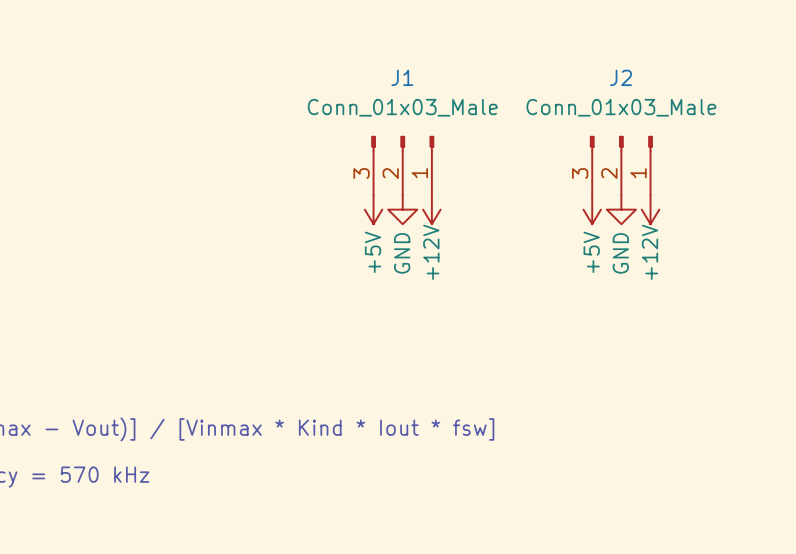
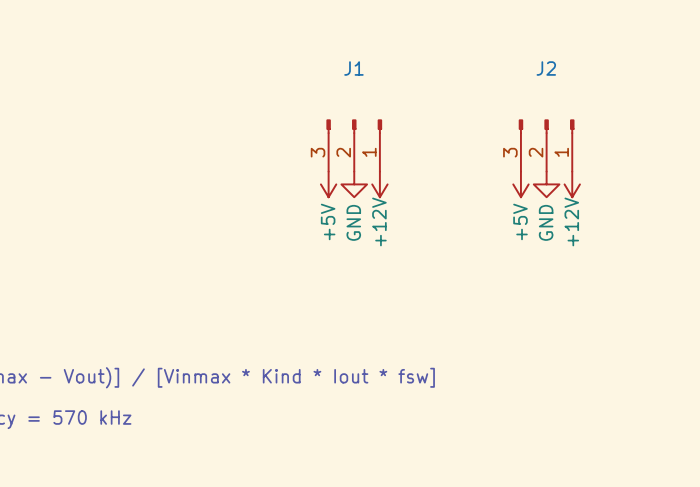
J1 value: Conn_01x03_Male (402, 107) -> none
J2 value: Conn_01x03_Male (621, 107) -> none

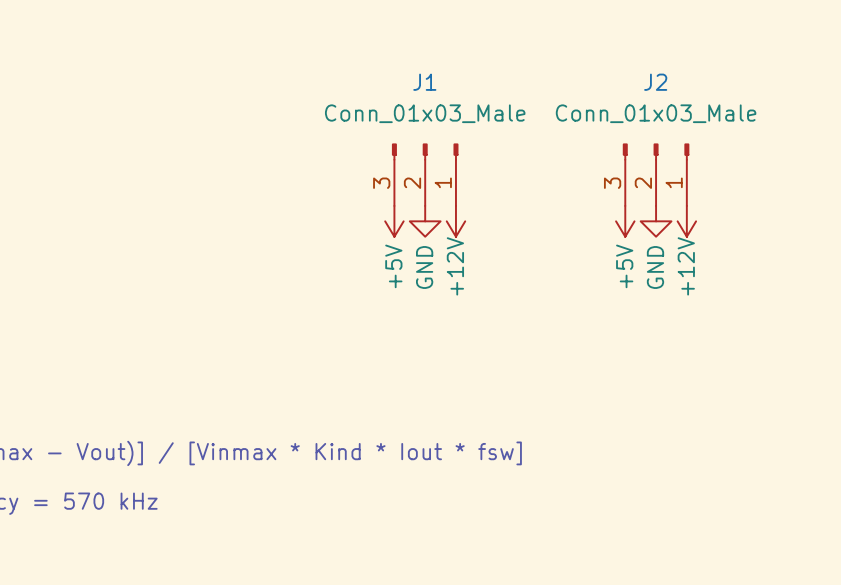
J1 value: none -> Conn_01x03_Male (425, 113)
J2 value: none -> Conn_01x03_Male (656, 113)

